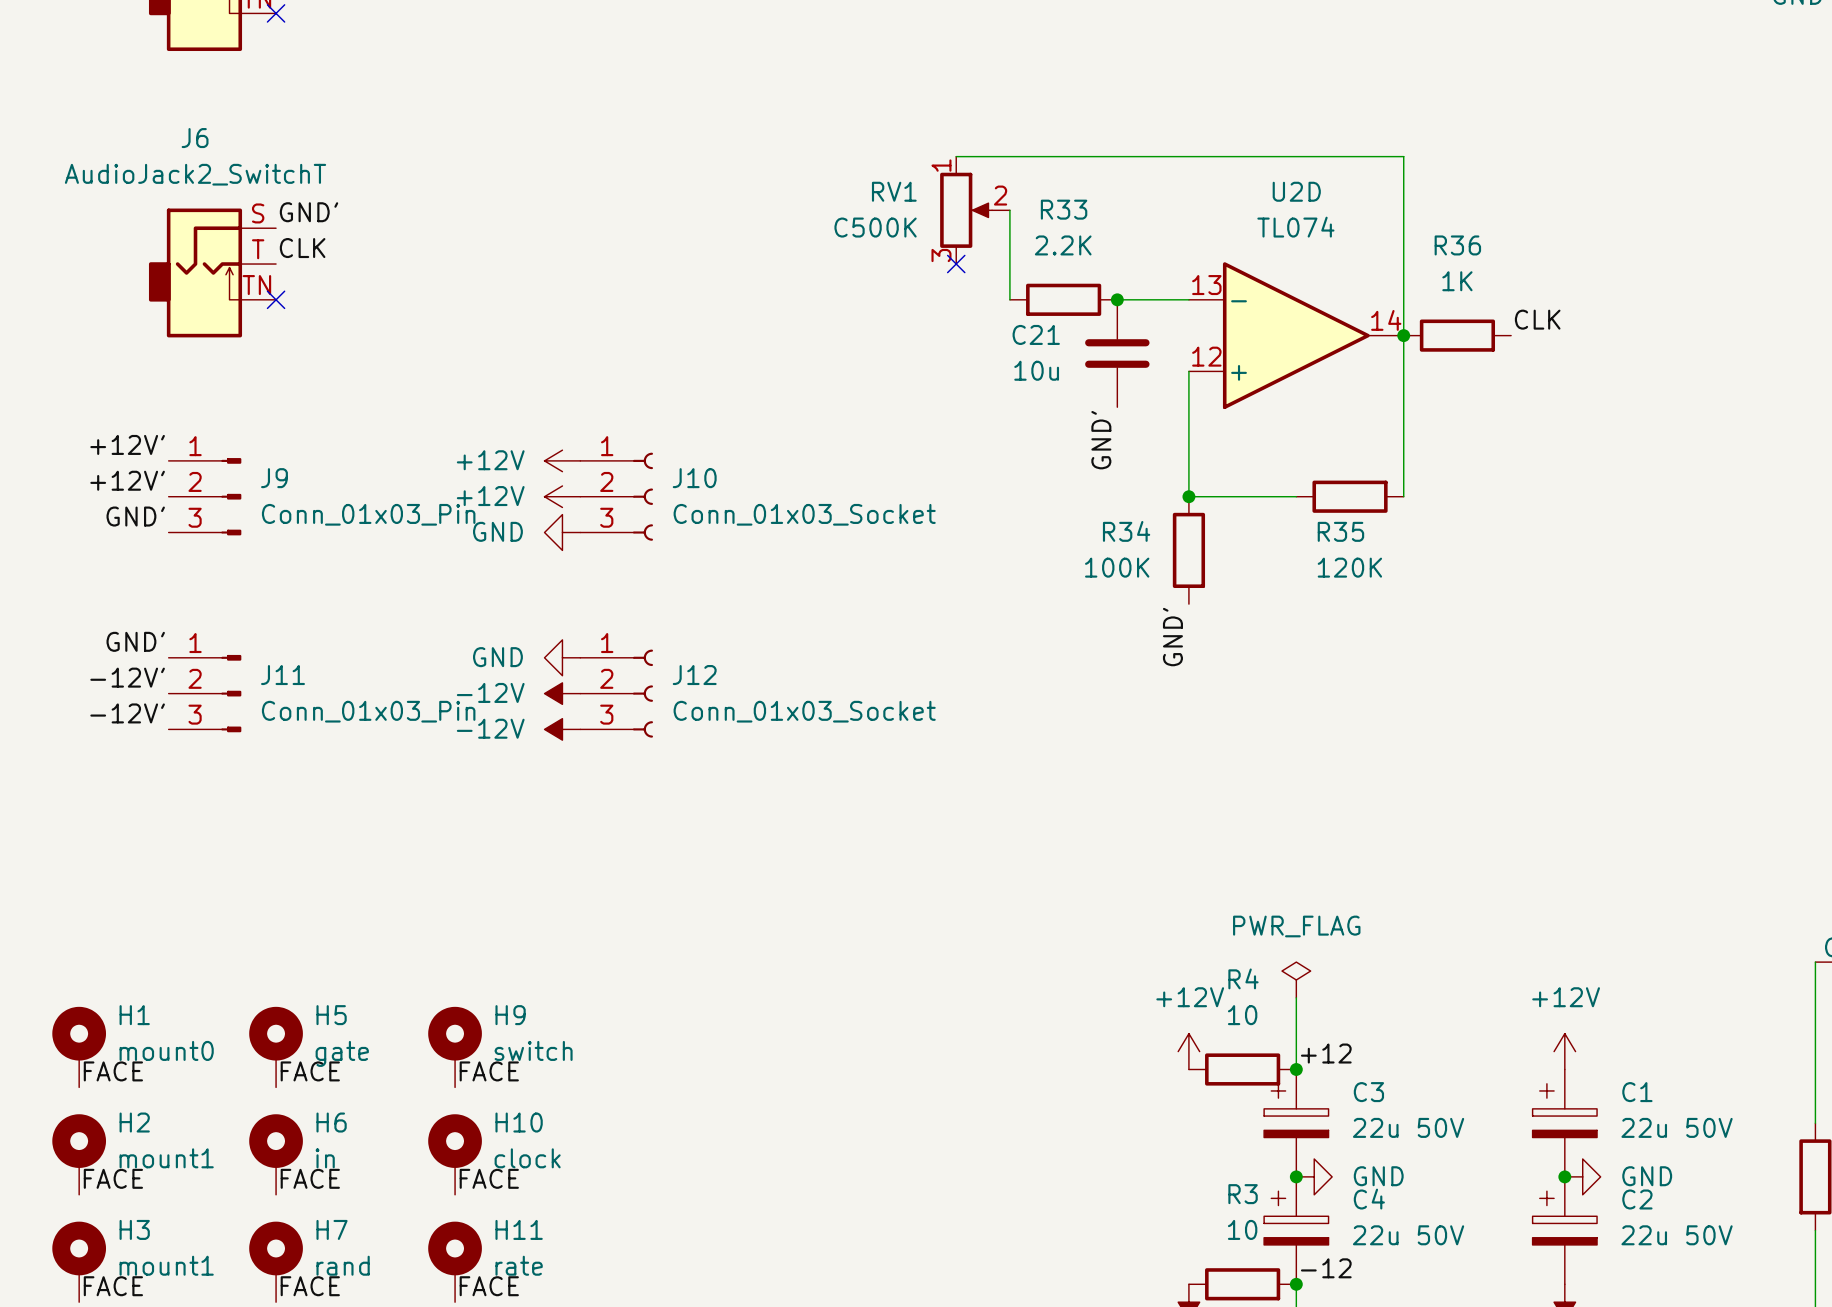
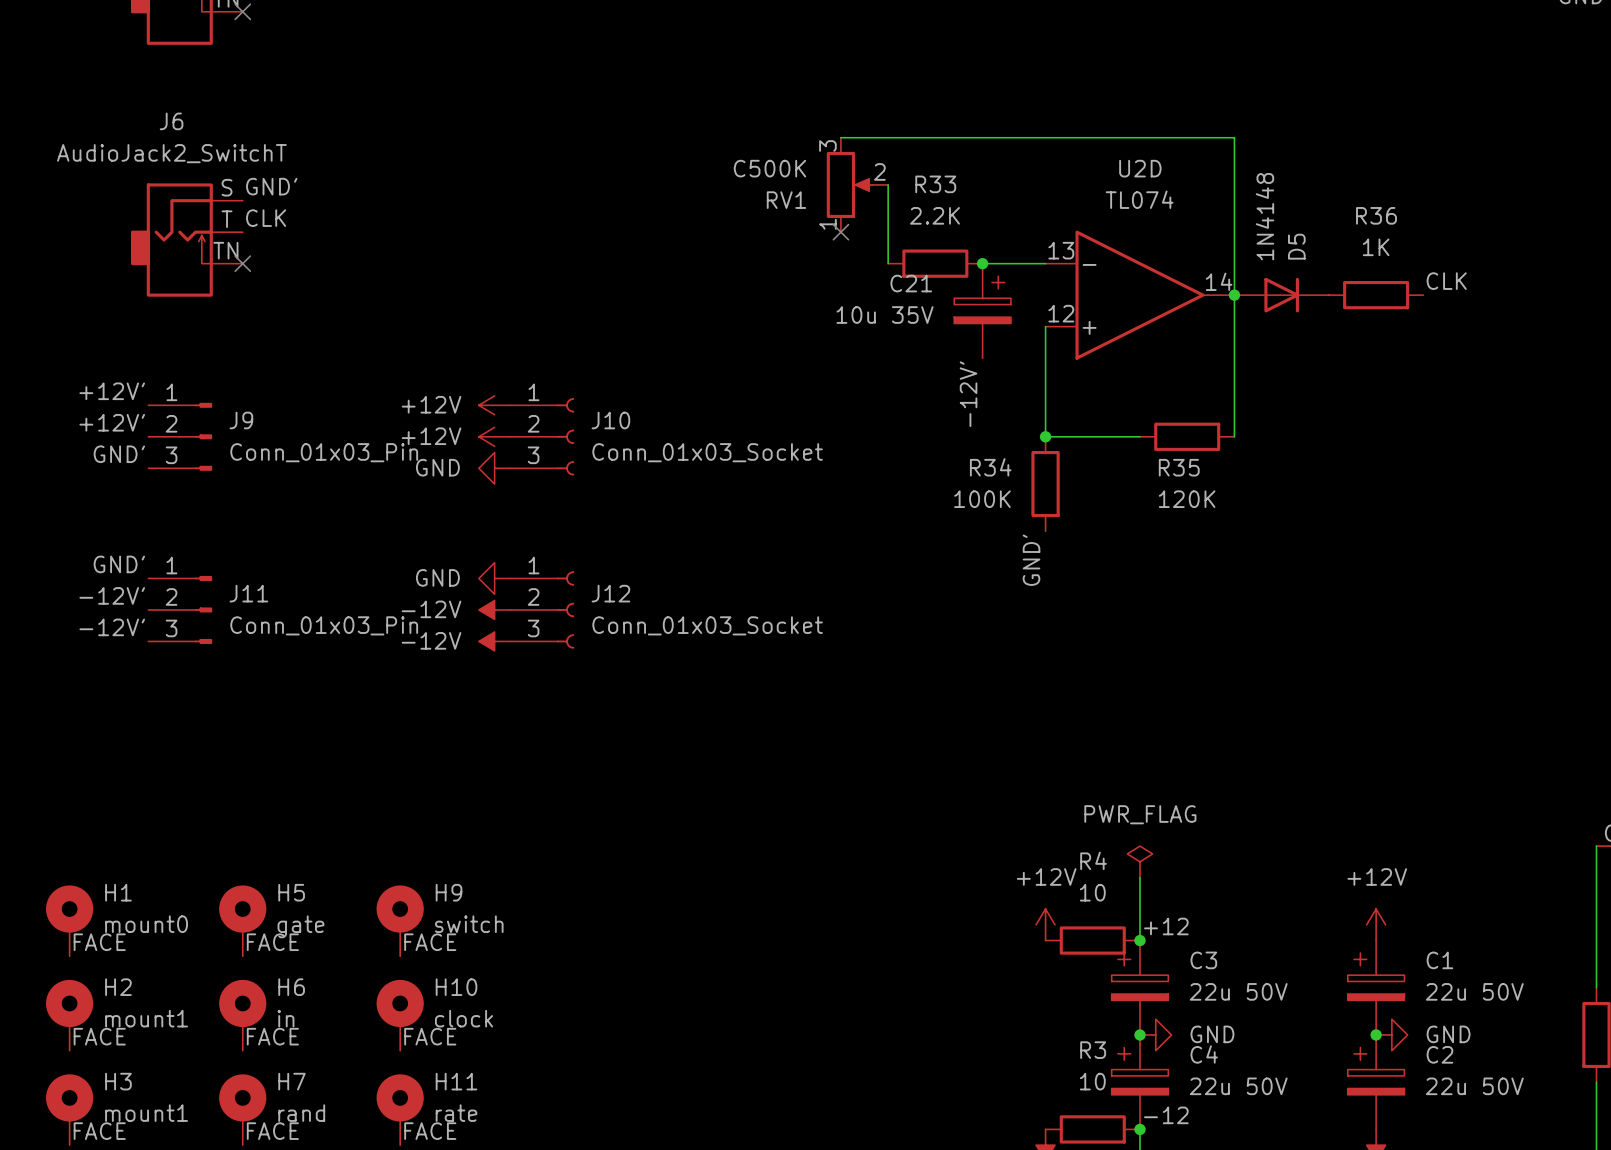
RV1 flip: as is (966, 210) -> up-down (849, 184)
C21 symbol: [1085, 299, 1150, 408] -> [954, 263, 1011, 359]
label position: CLK (1537, 319) -> CLK (1446, 281)
R36 position: (1457, 335) -> (1376, 295)
D5: none -> 1N4148 (1281, 295)
C21 value: 10u (1036, 370) -> 10u 35V (885, 315)
label: GND' (1101, 440) -> -12V' (968, 394)

